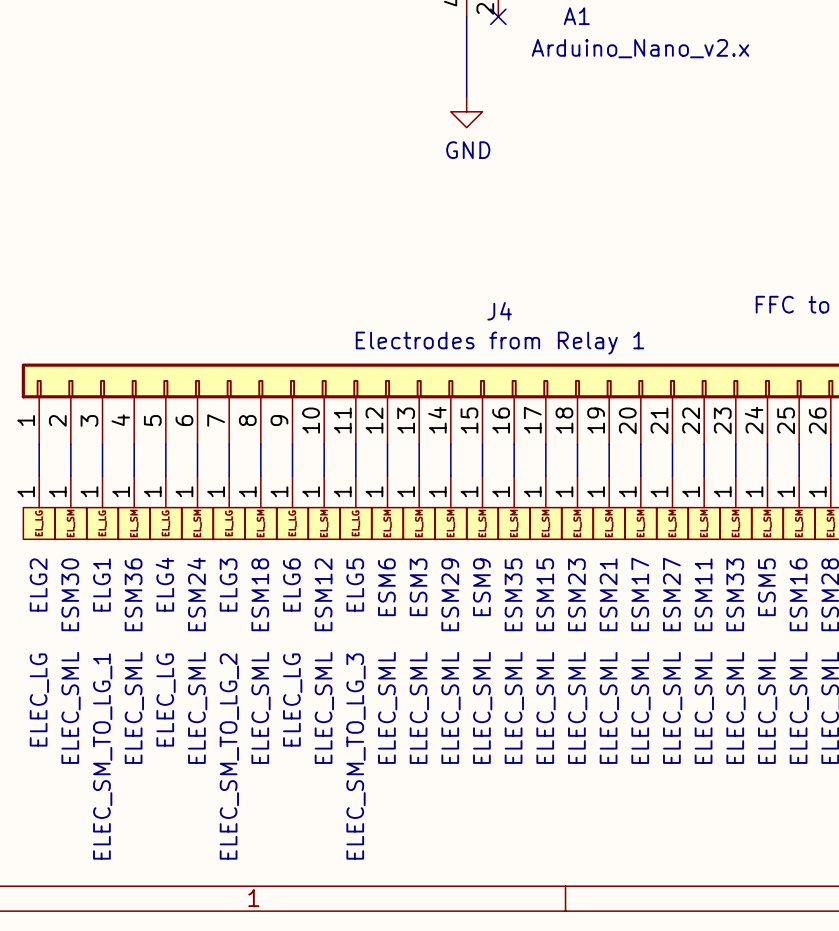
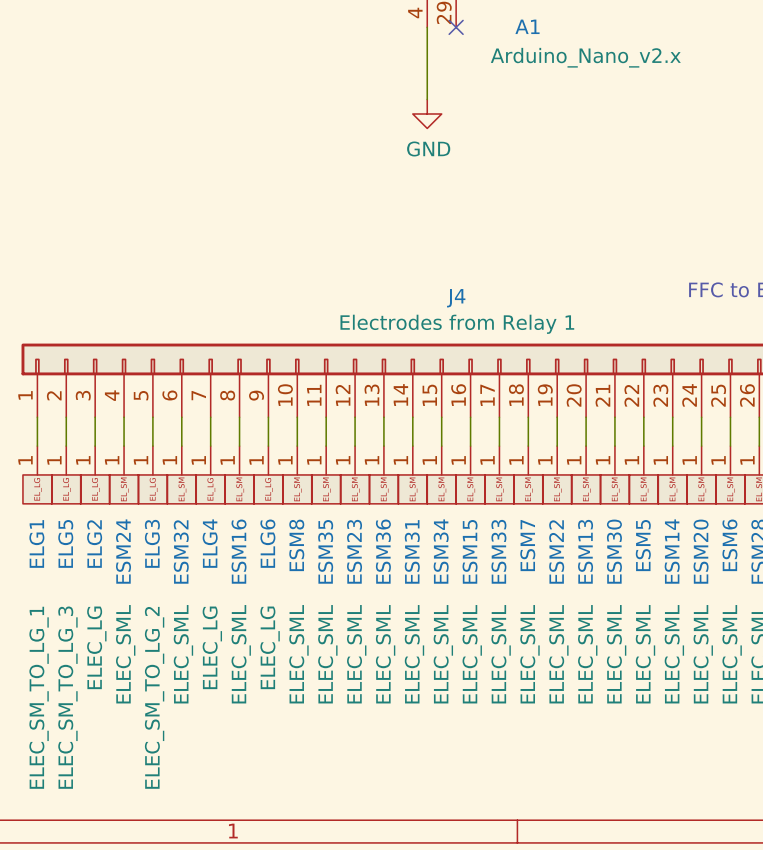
ESM30: ELEC_SML (70, 507) -> none
ELG5 position: (355, 507) -> (66, 474)
ESM35: none -> ELEC_SML (326, 474)
ELG4 name: ELG4 (164, 584) -> ELG3 (152, 543)
ELG2 name: ELG2 (38, 585) -> ELG1 (36, 543)
ELG1 name: ELG1 (101, 585) -> ELG2 (94, 544)
ELG3 name: ELG3 (228, 585) -> ELG4 (210, 543)
ESM6 name: ESM6 (386, 587) -> ESM23 (354, 551)
ESM3 name: ESM3 (418, 587) -> ESM36 (383, 551)
ESM9 name: ESM9 (481, 587) -> ESM34 (441, 551)
ESM5 name: ESM5 (766, 587) -> ESM20 (701, 551)
ESM36 name: ESM36 (133, 594) -> ESM24 (123, 551)
ESM24 name: ESM24 (196, 594) -> ESM32 (181, 551)
ESM18 name: ESM18 (260, 594) -> ESM16 (239, 551)
ESM12 name: ESM12 (323, 594) -> ESM8 (296, 545)
ESM29 name: ESM29 (450, 594) -> ESM31 (412, 551)
ESM35 name: ESM35 (513, 594) -> ESM15 (470, 551)
ESM15 name: ESM15 (545, 594) -> ESM33 (498, 551)
ESM23 name: ESM23 (576, 594) -> ESM7 (527, 545)
ESM21 name: ESM21 (608, 594) -> ESM22 (556, 551)
ESM17 name: ESM17 (640, 594) -> ESM13 (585, 551)
ESM27 name: ESM27 (671, 594) -> ESM30 (614, 551)
ESM11 name: ESM11 (703, 594) -> ESM5 (643, 545)
ESM33 name: ESM33 (735, 594) -> ESM14 (672, 551)
ESM16 name: ESM16 (798, 594) -> ESM6 (729, 545)
ELG2 value: ELEC_LG (39, 699) -> ELEC_SM_TO_LG_1 (39, 697)
ELG4 value: ELEC_LG (166, 699) -> ELEC_SM_TO_LG_2 (154, 697)
ELG1 value: ELEC_SM_TO_LG_1 (102, 756) -> ELEC_LG (96, 647)
ELG3 value: ELEC_SM_TO_LG_2 (229, 756) -> ELEC_LG (212, 647)

